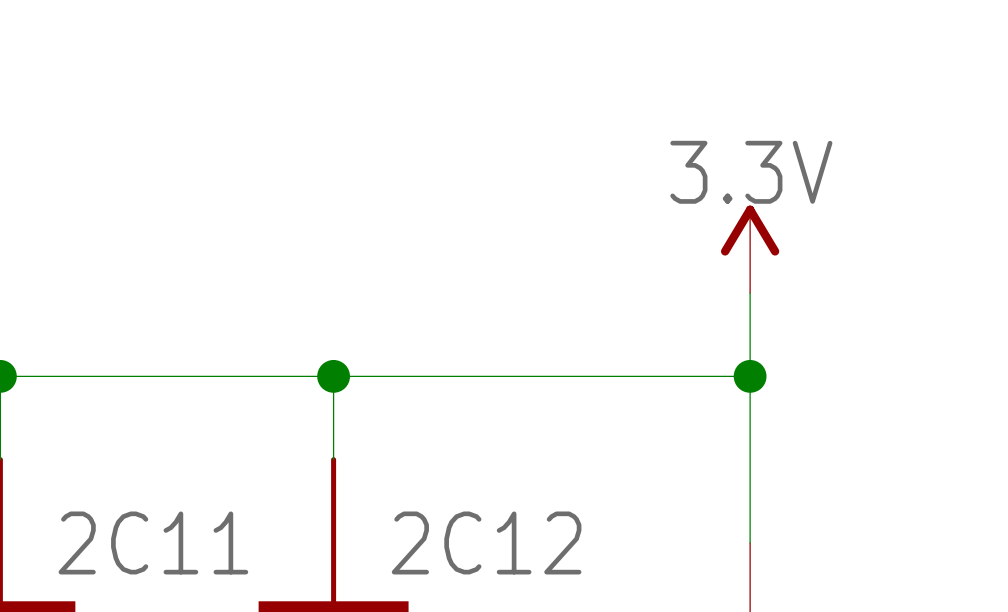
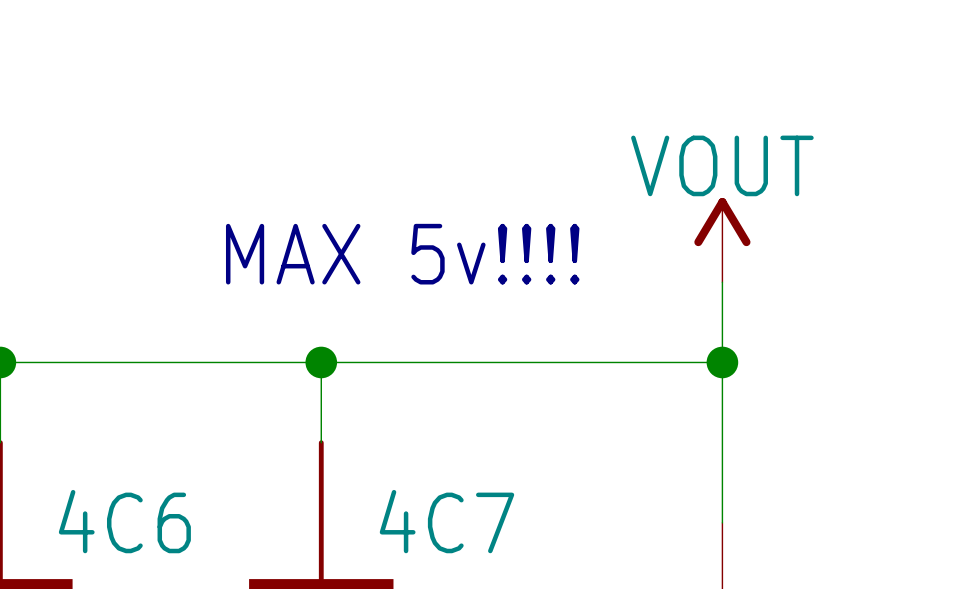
power symbol: 3.3V (750, 249) -> VOUT (722, 240)
text: none -> MAX 5v!!!! (402, 254)
2C11 name: 2C11 (153, 542) -> 4C6 (124, 521)
2C12 name: 2C12 (486, 542) -> 4C7 (446, 521)

